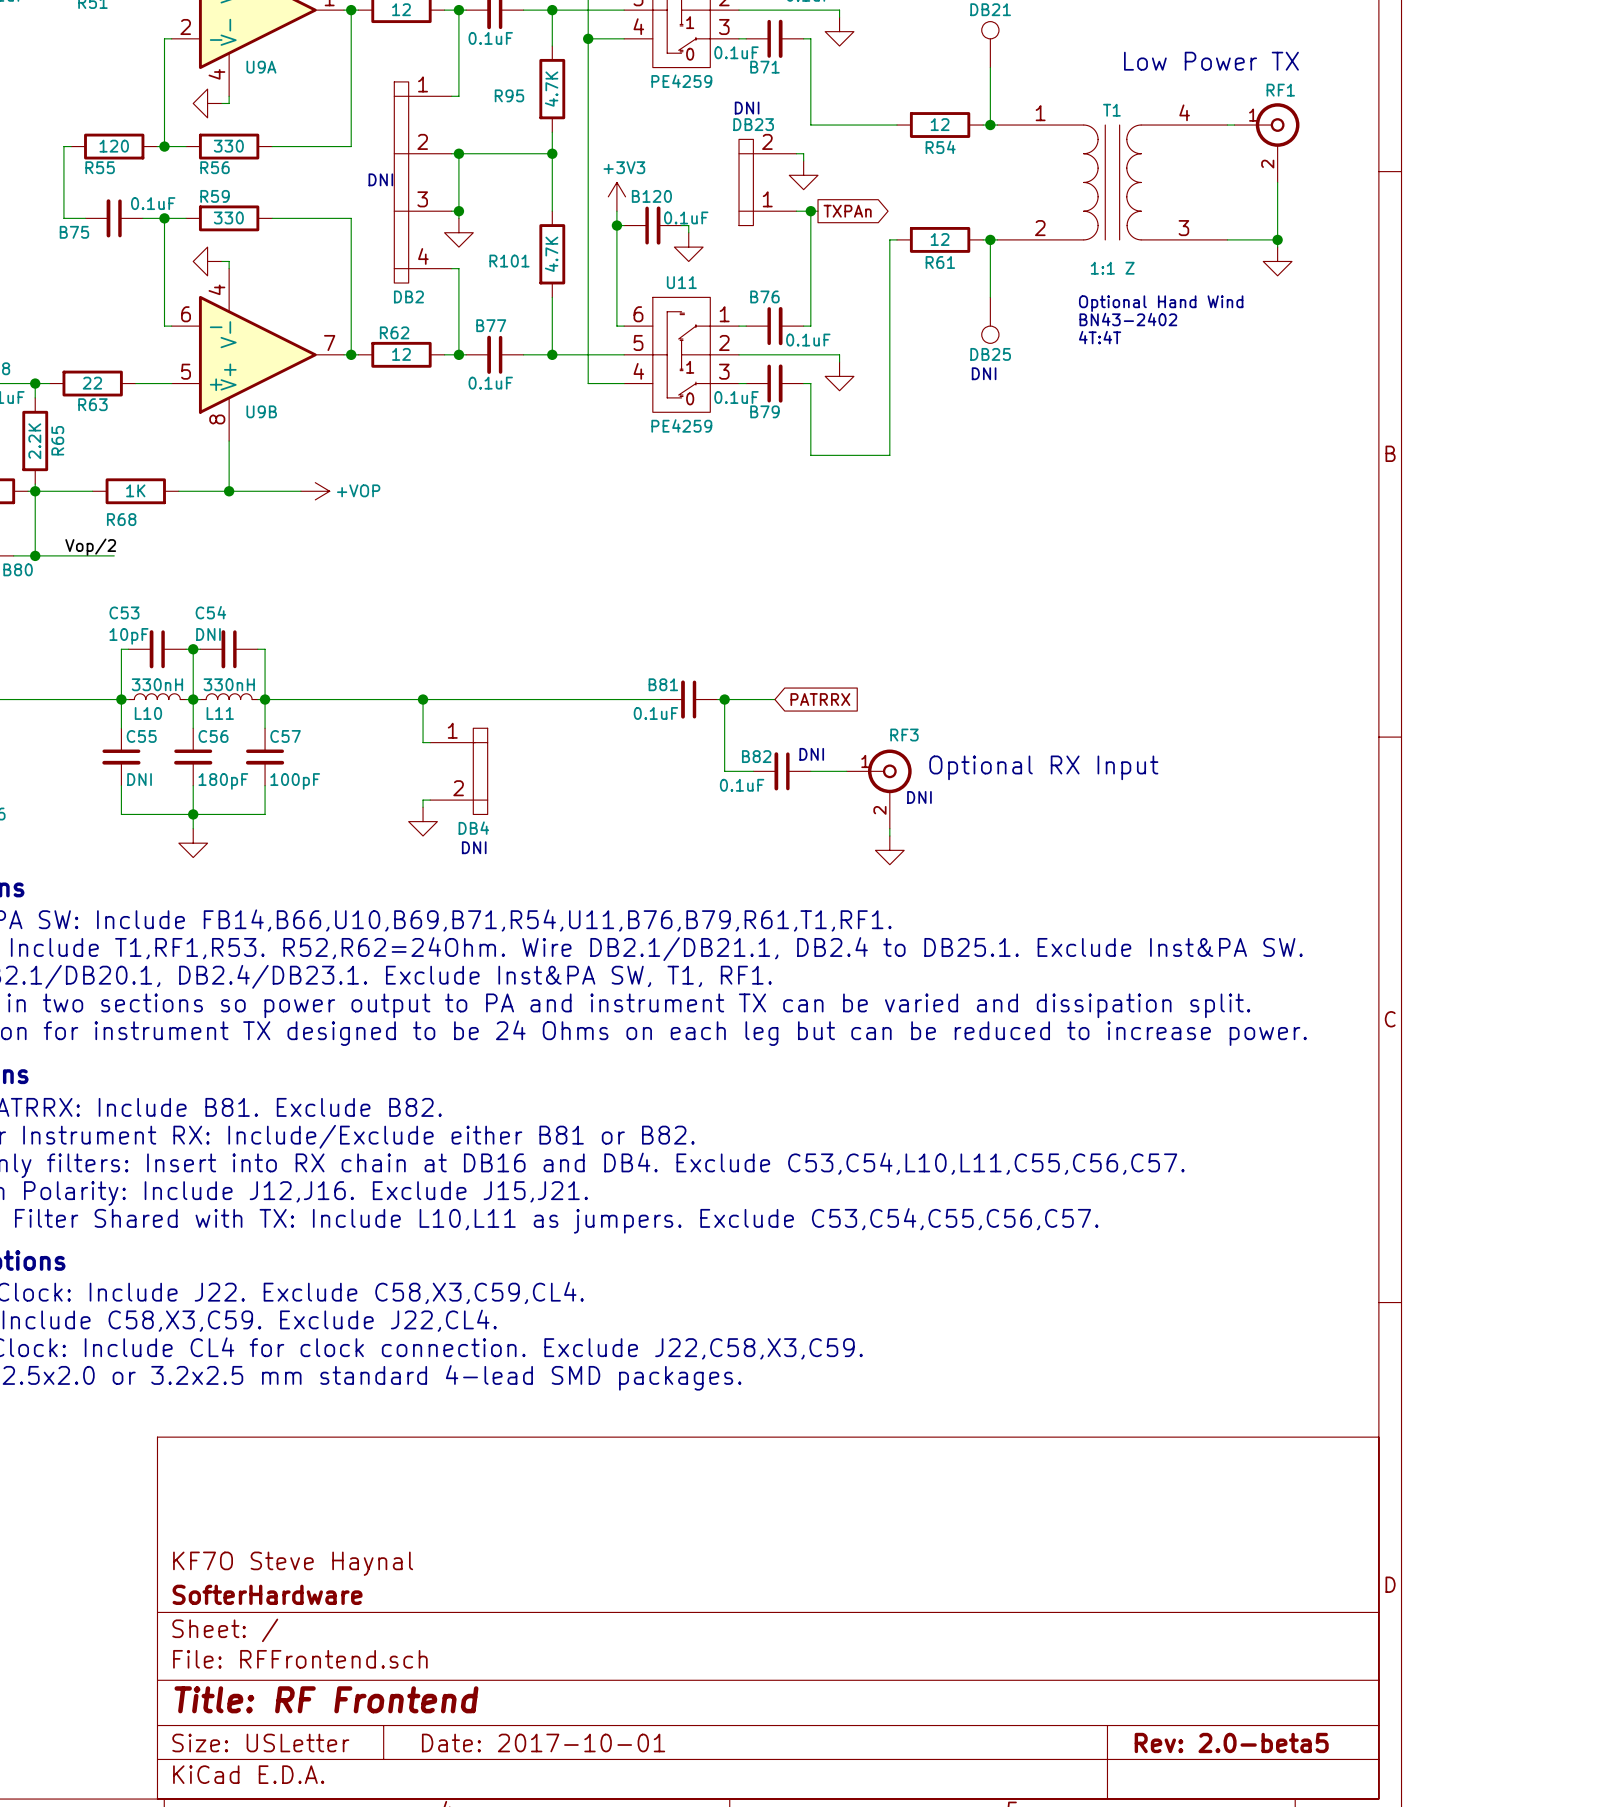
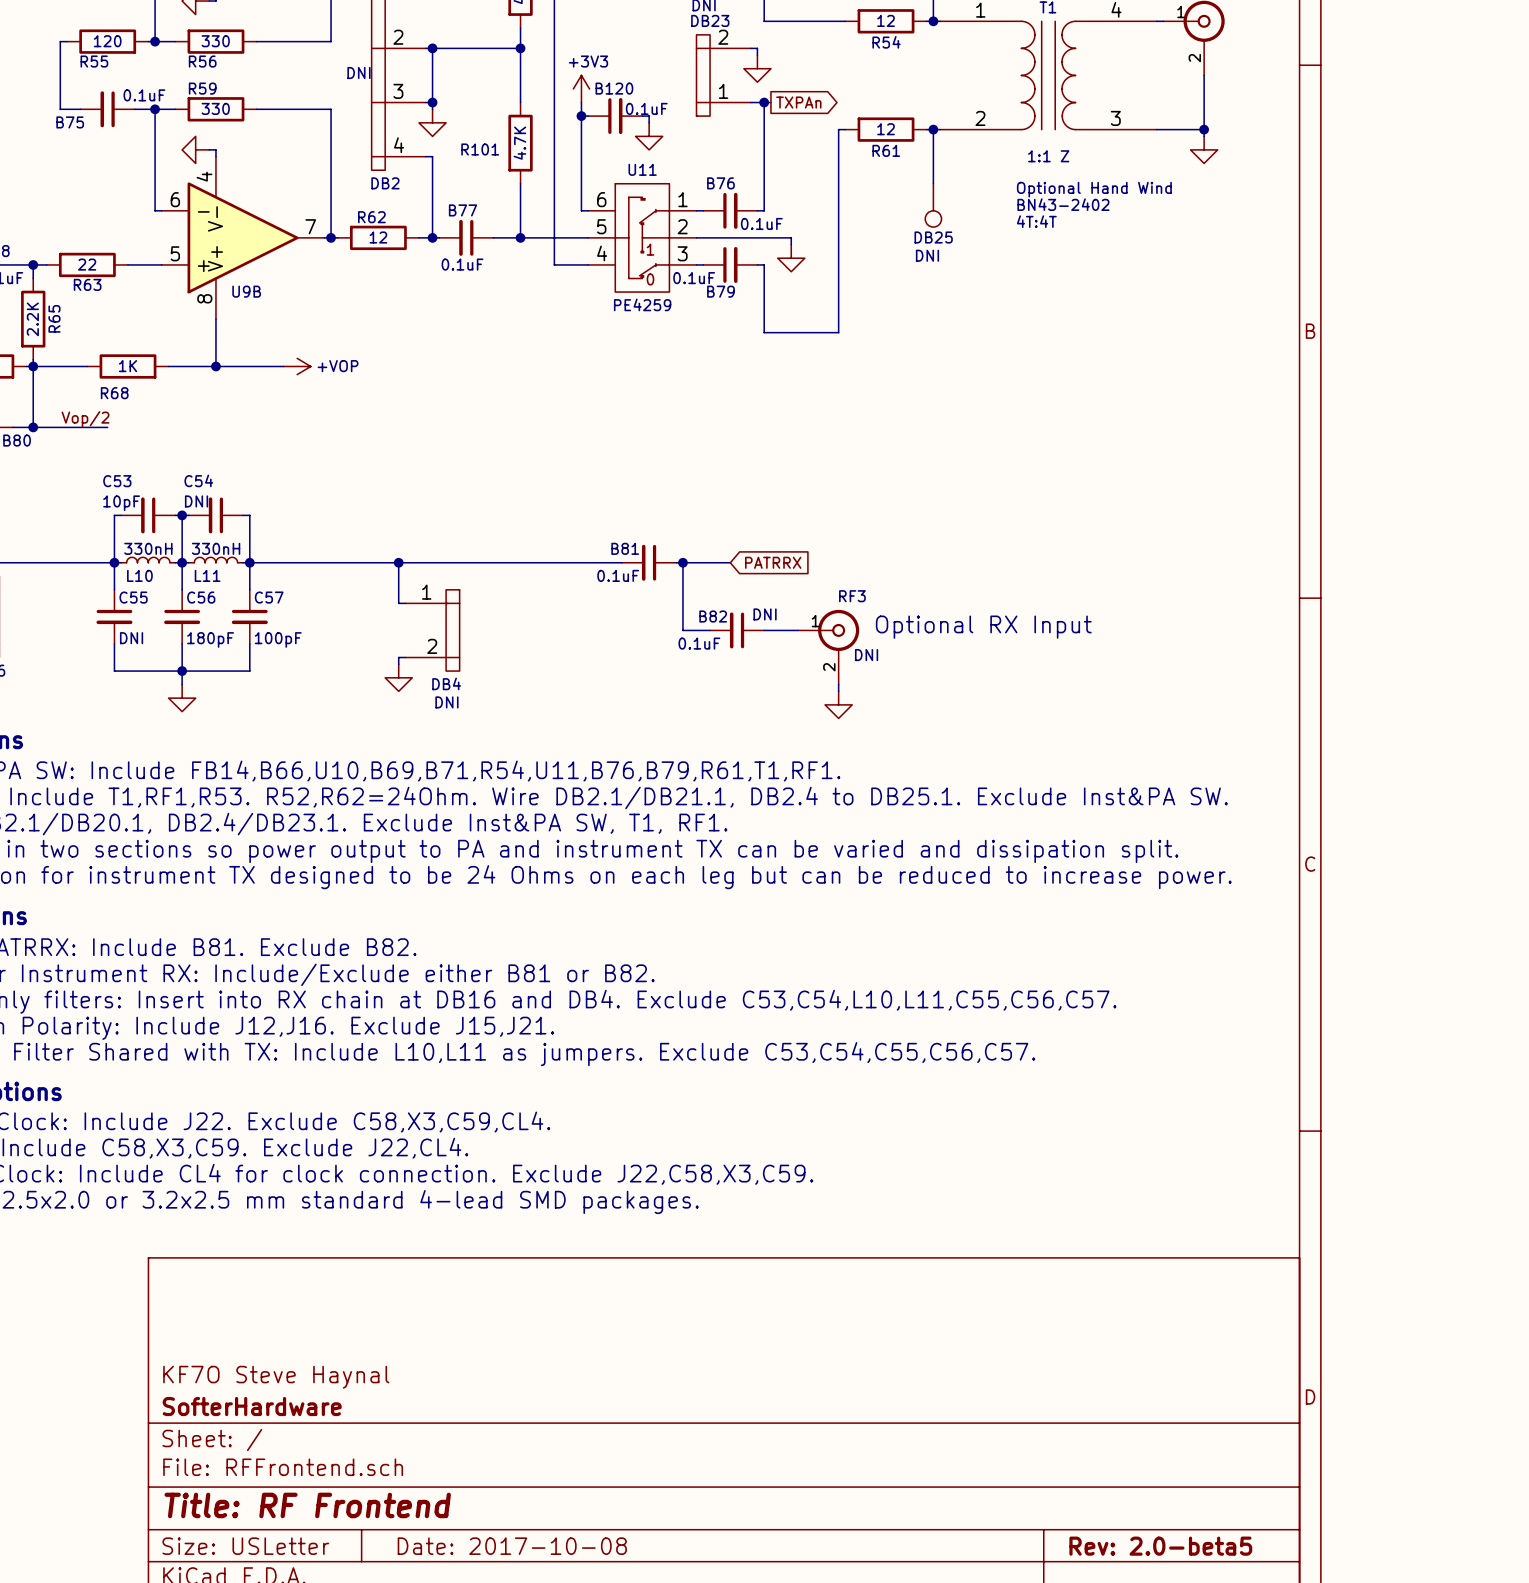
title block: Date: 2017-10-01 (543, 1742) -> Date: 2017-10-08 (512, 1546)

